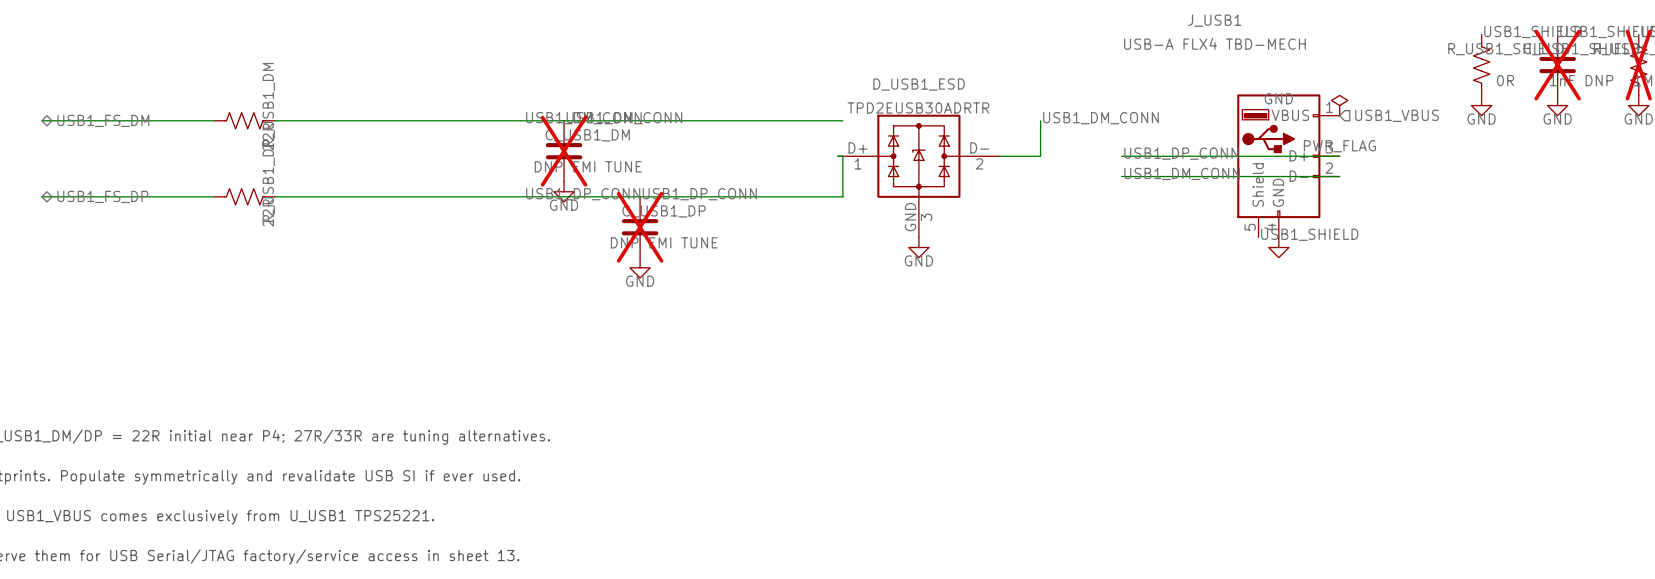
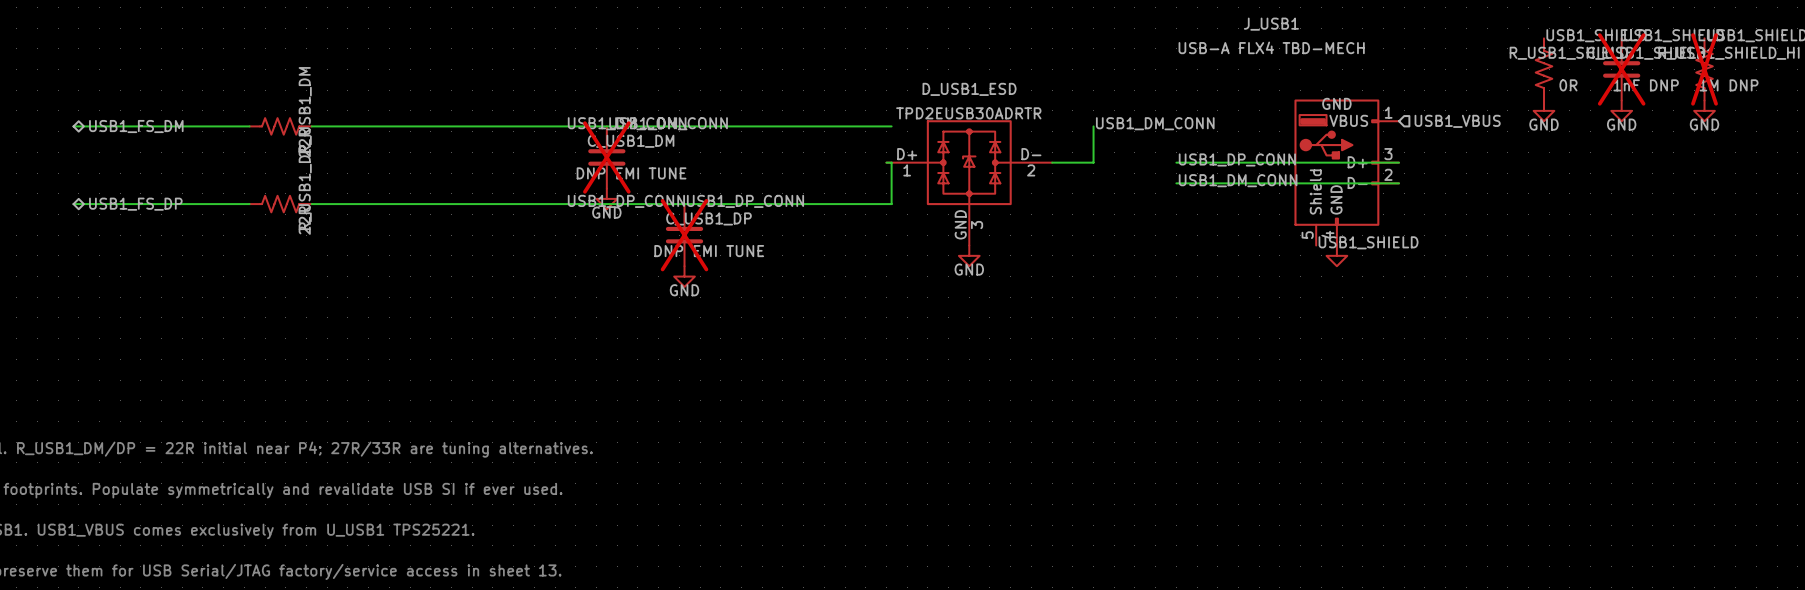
power symbol: PWR_FLAG (1339, 105) -> none

